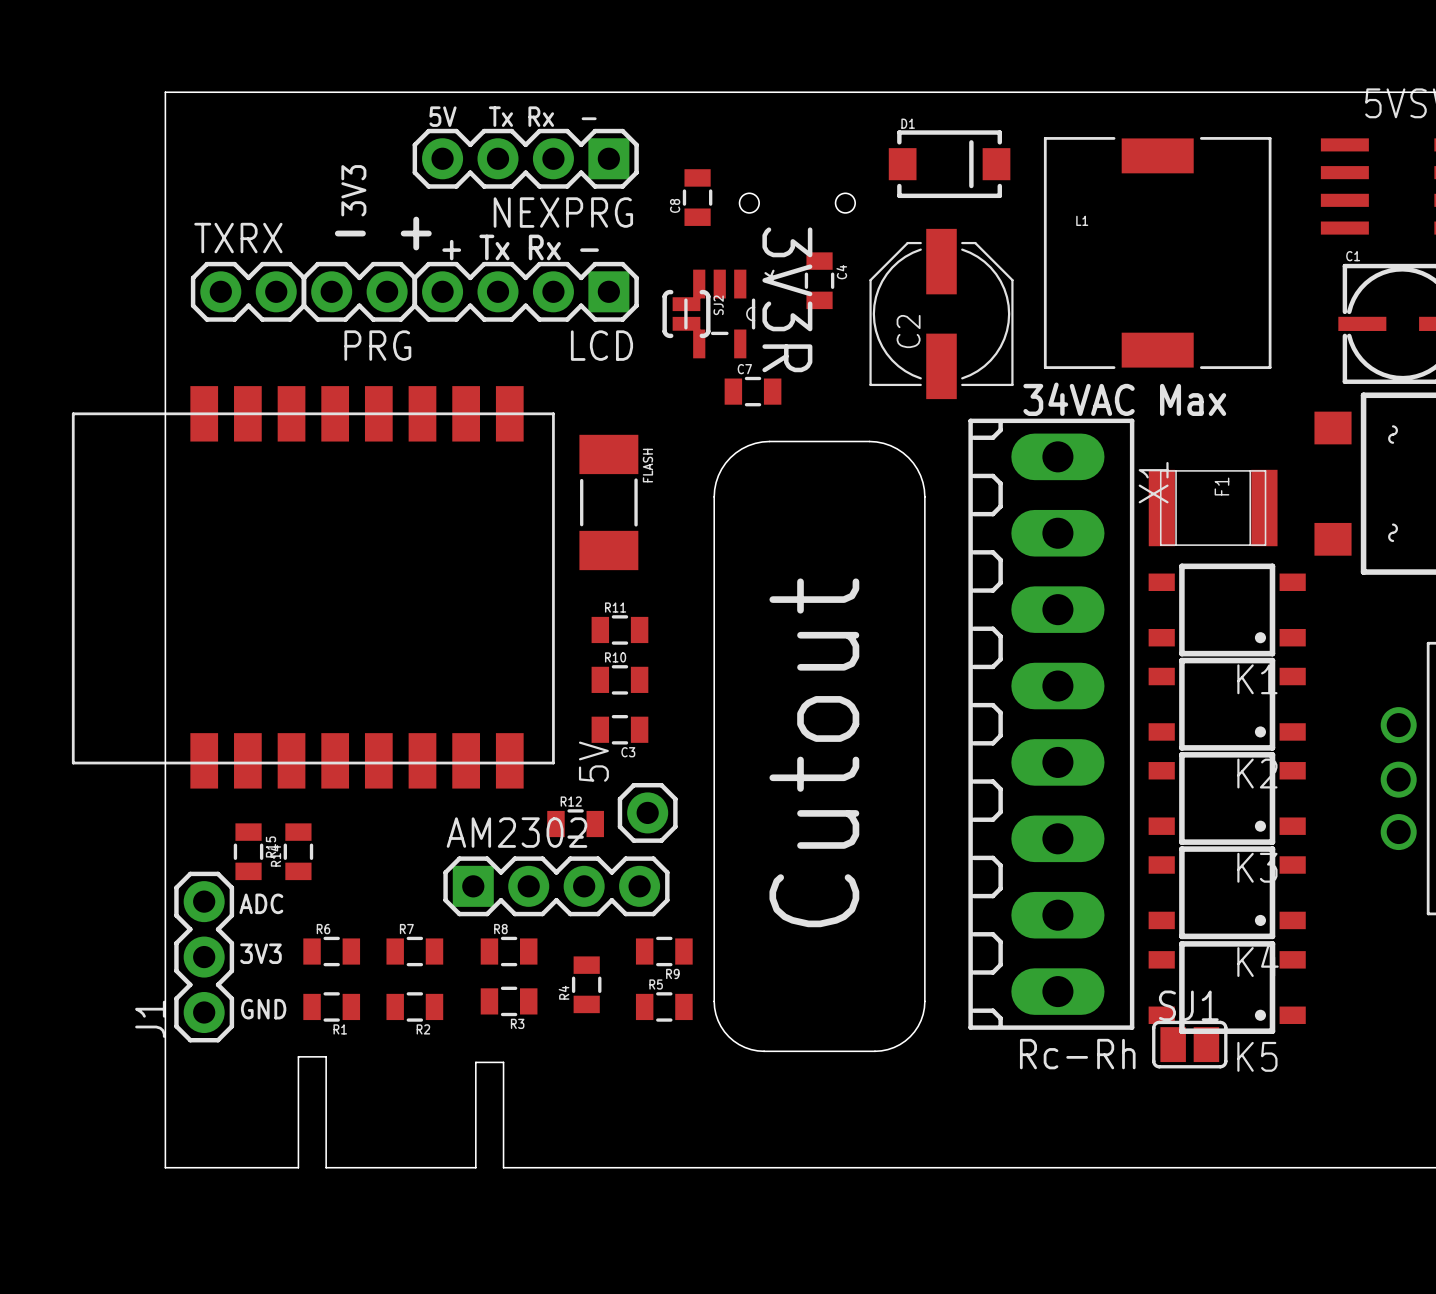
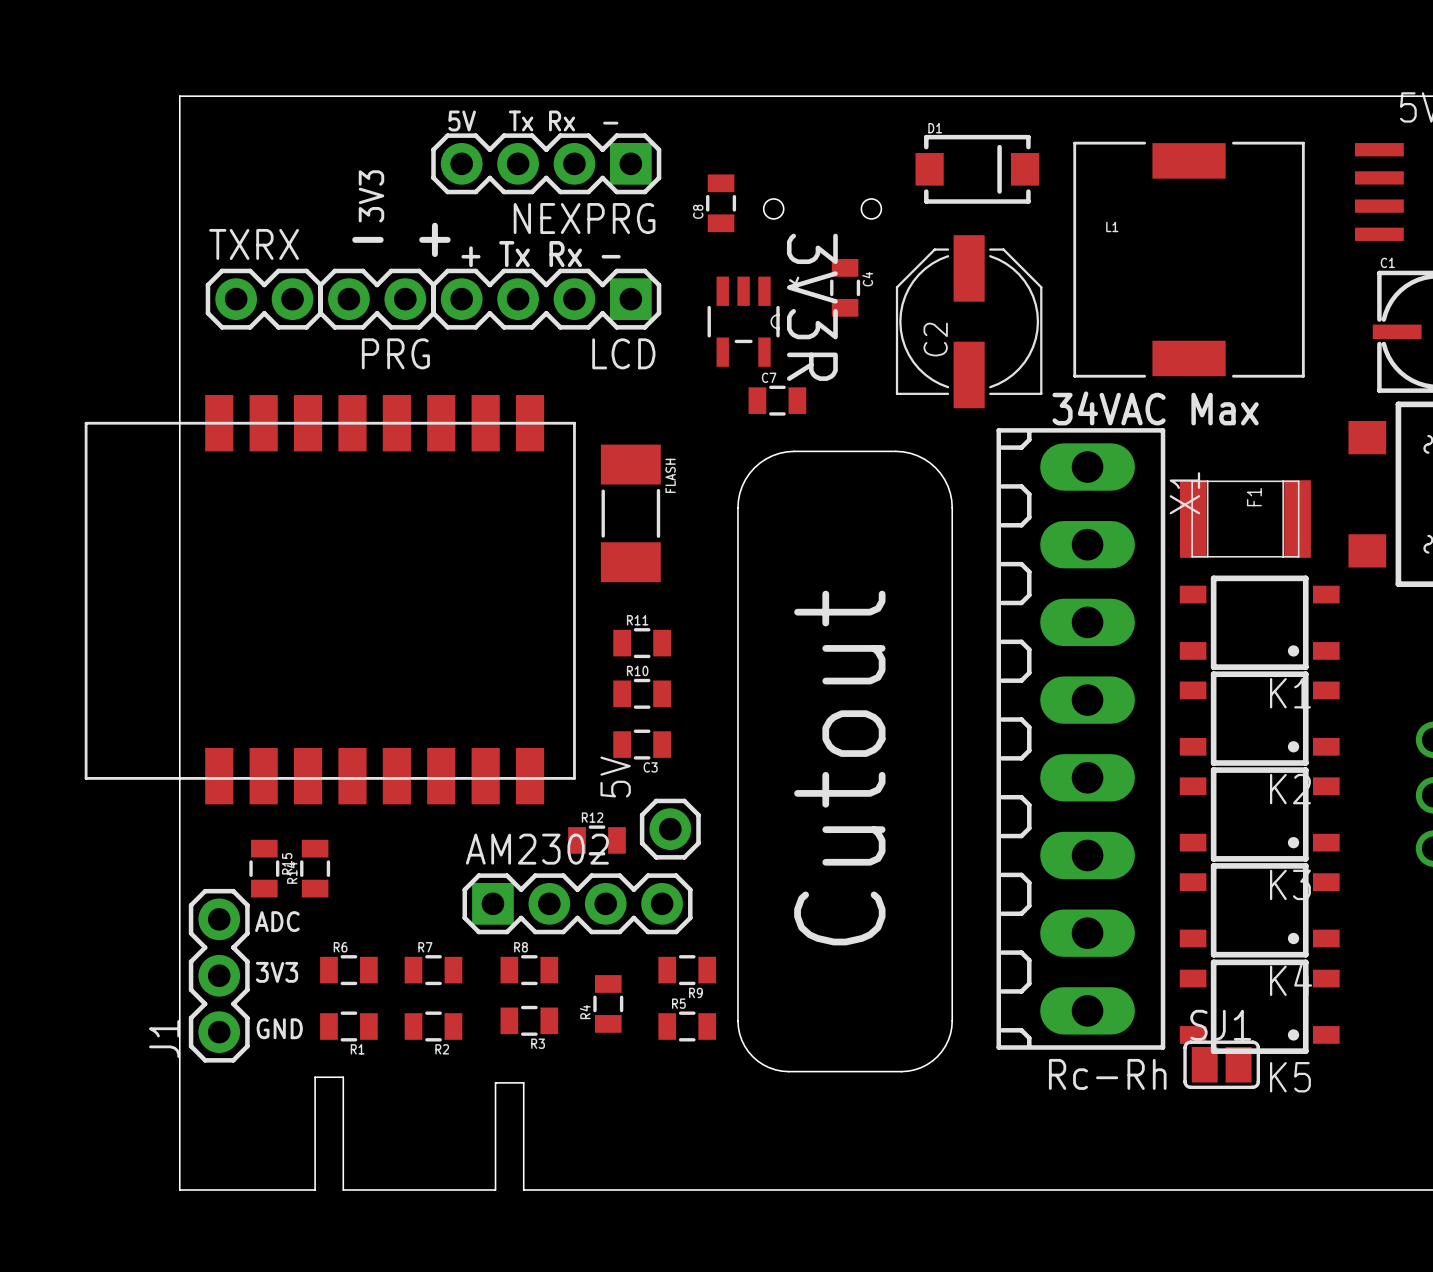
SJ2: (686, 313) -> none

